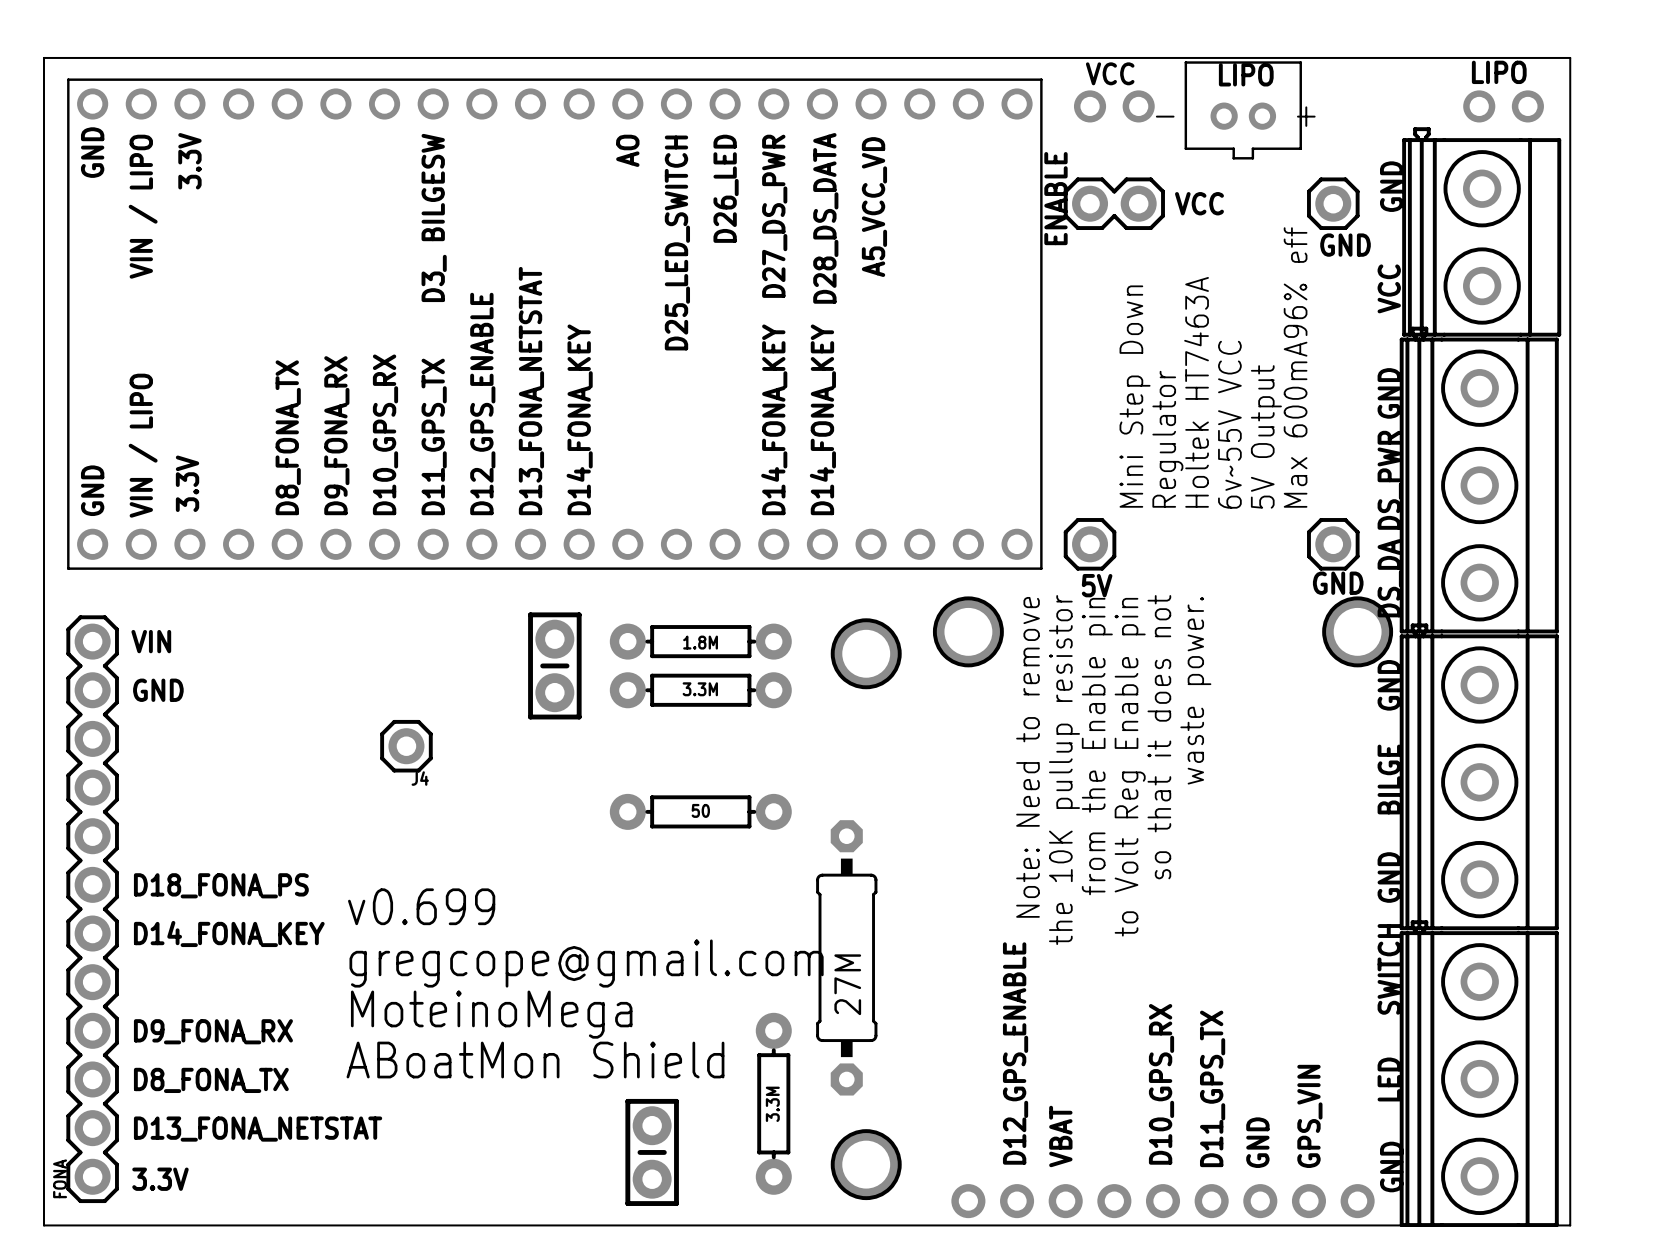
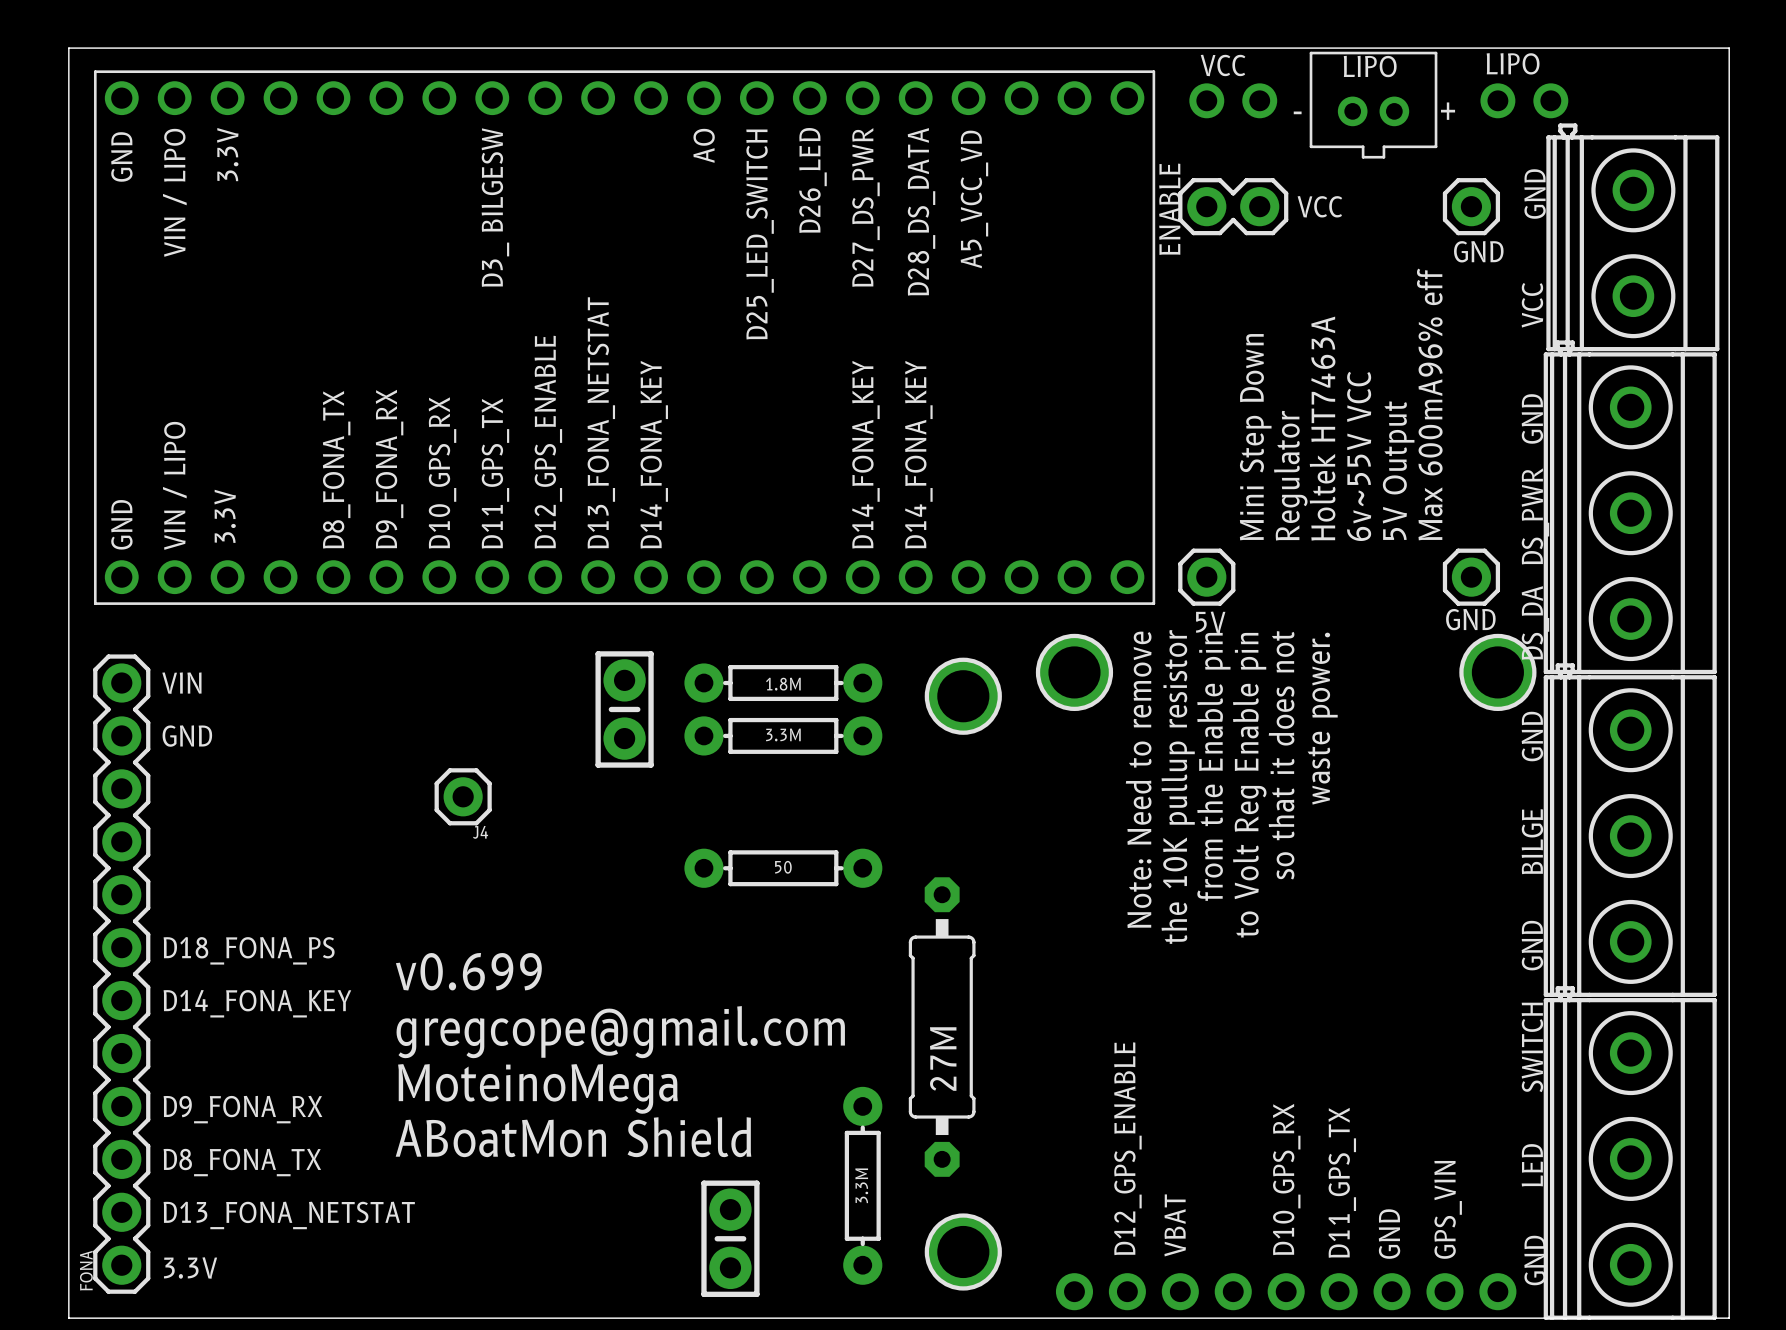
text position: LIPO (1499, 72) -> LIPO (1513, 63)
part position: (1503, 106) -> (1524, 100)

